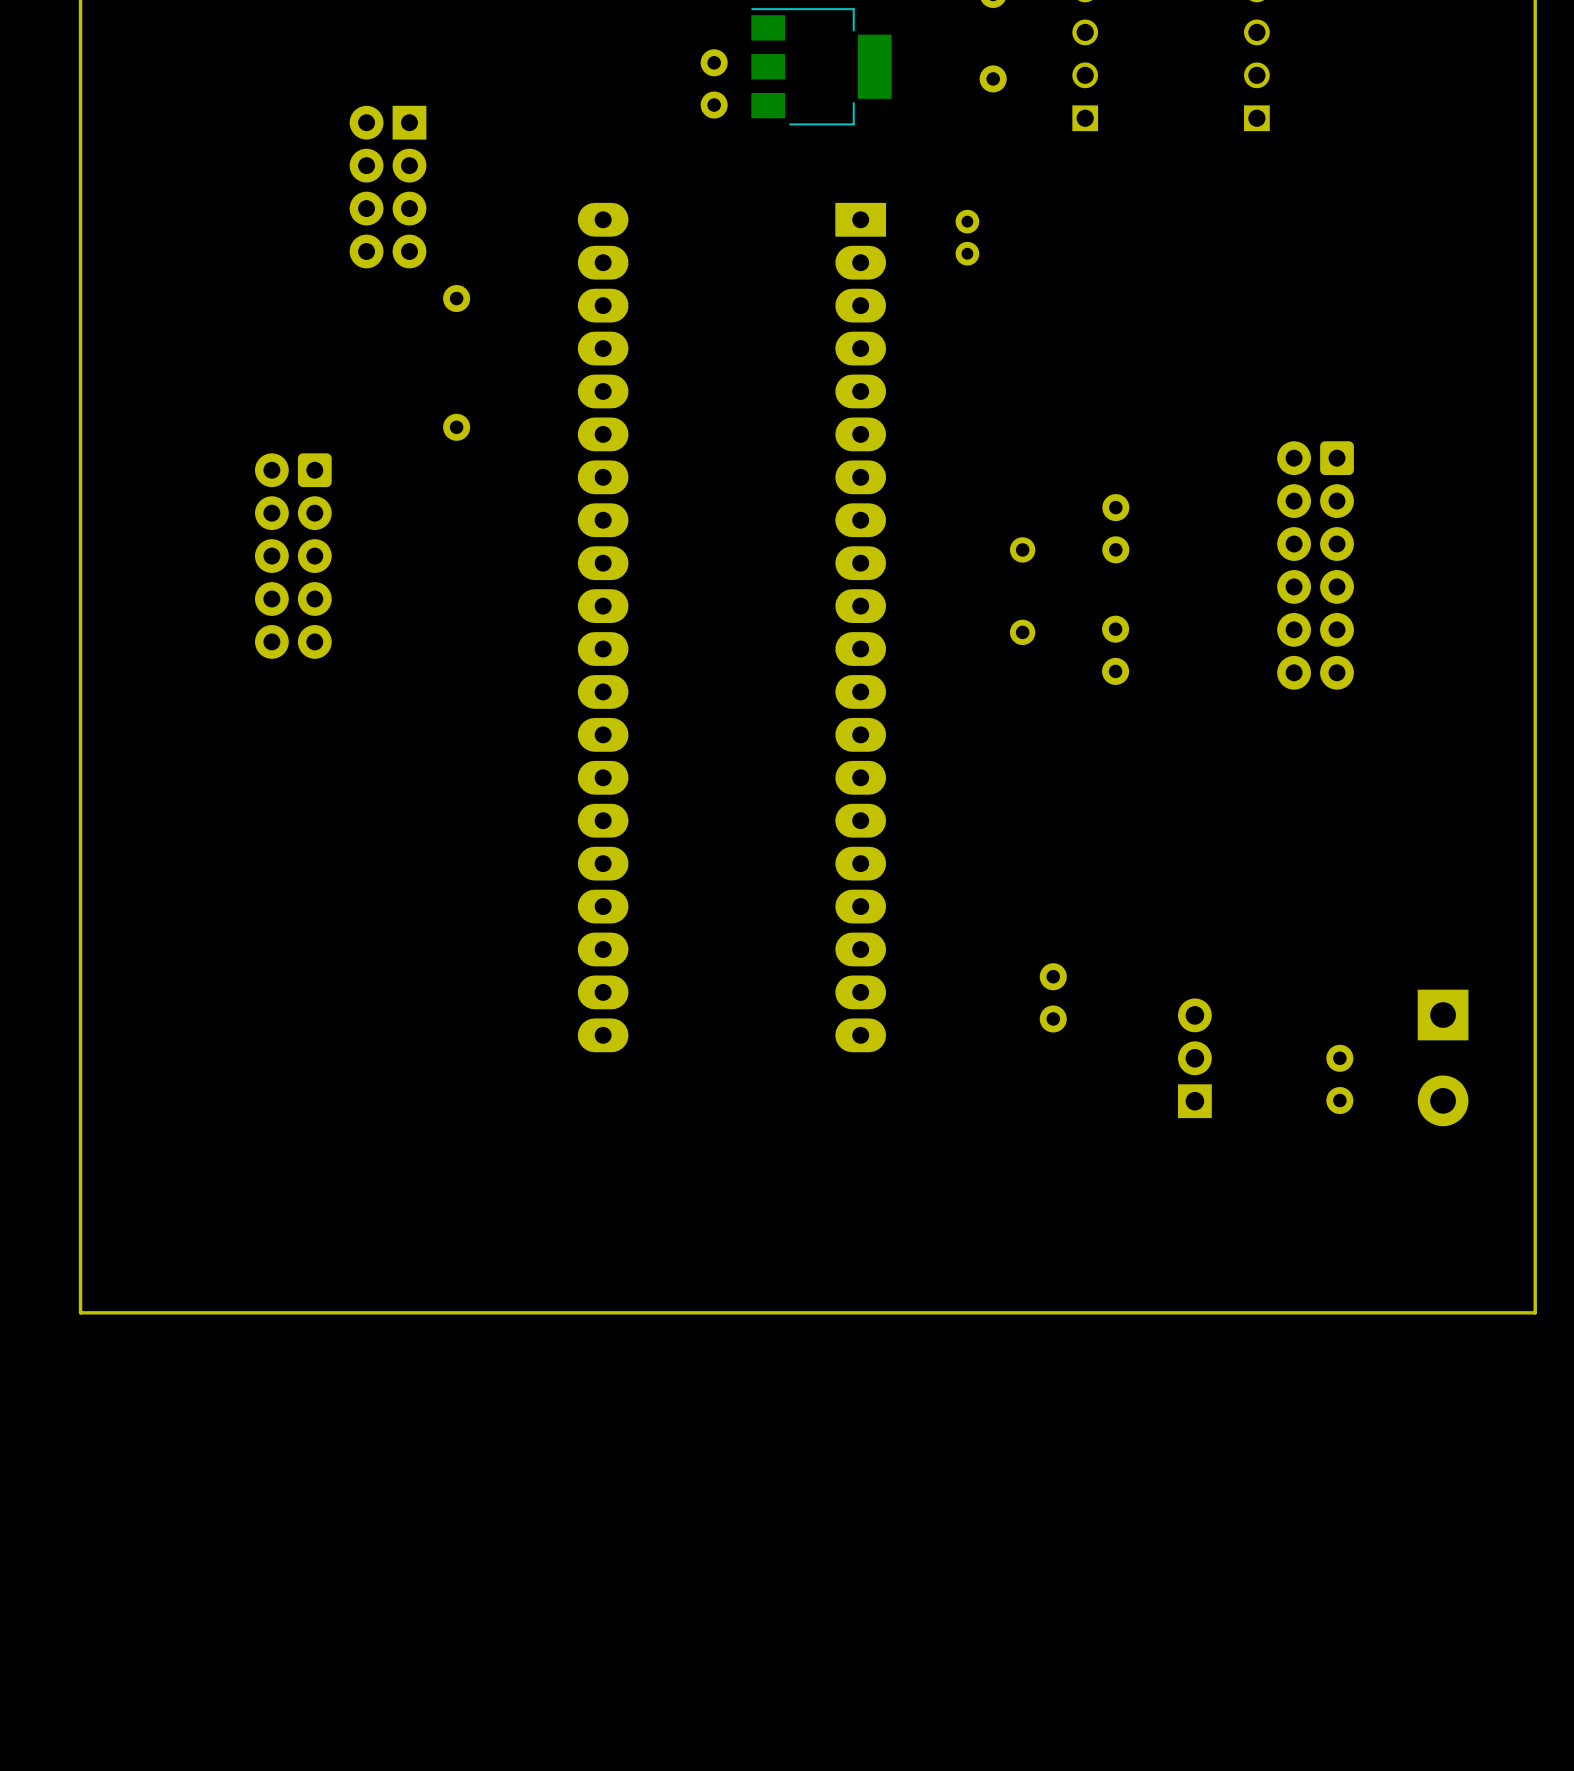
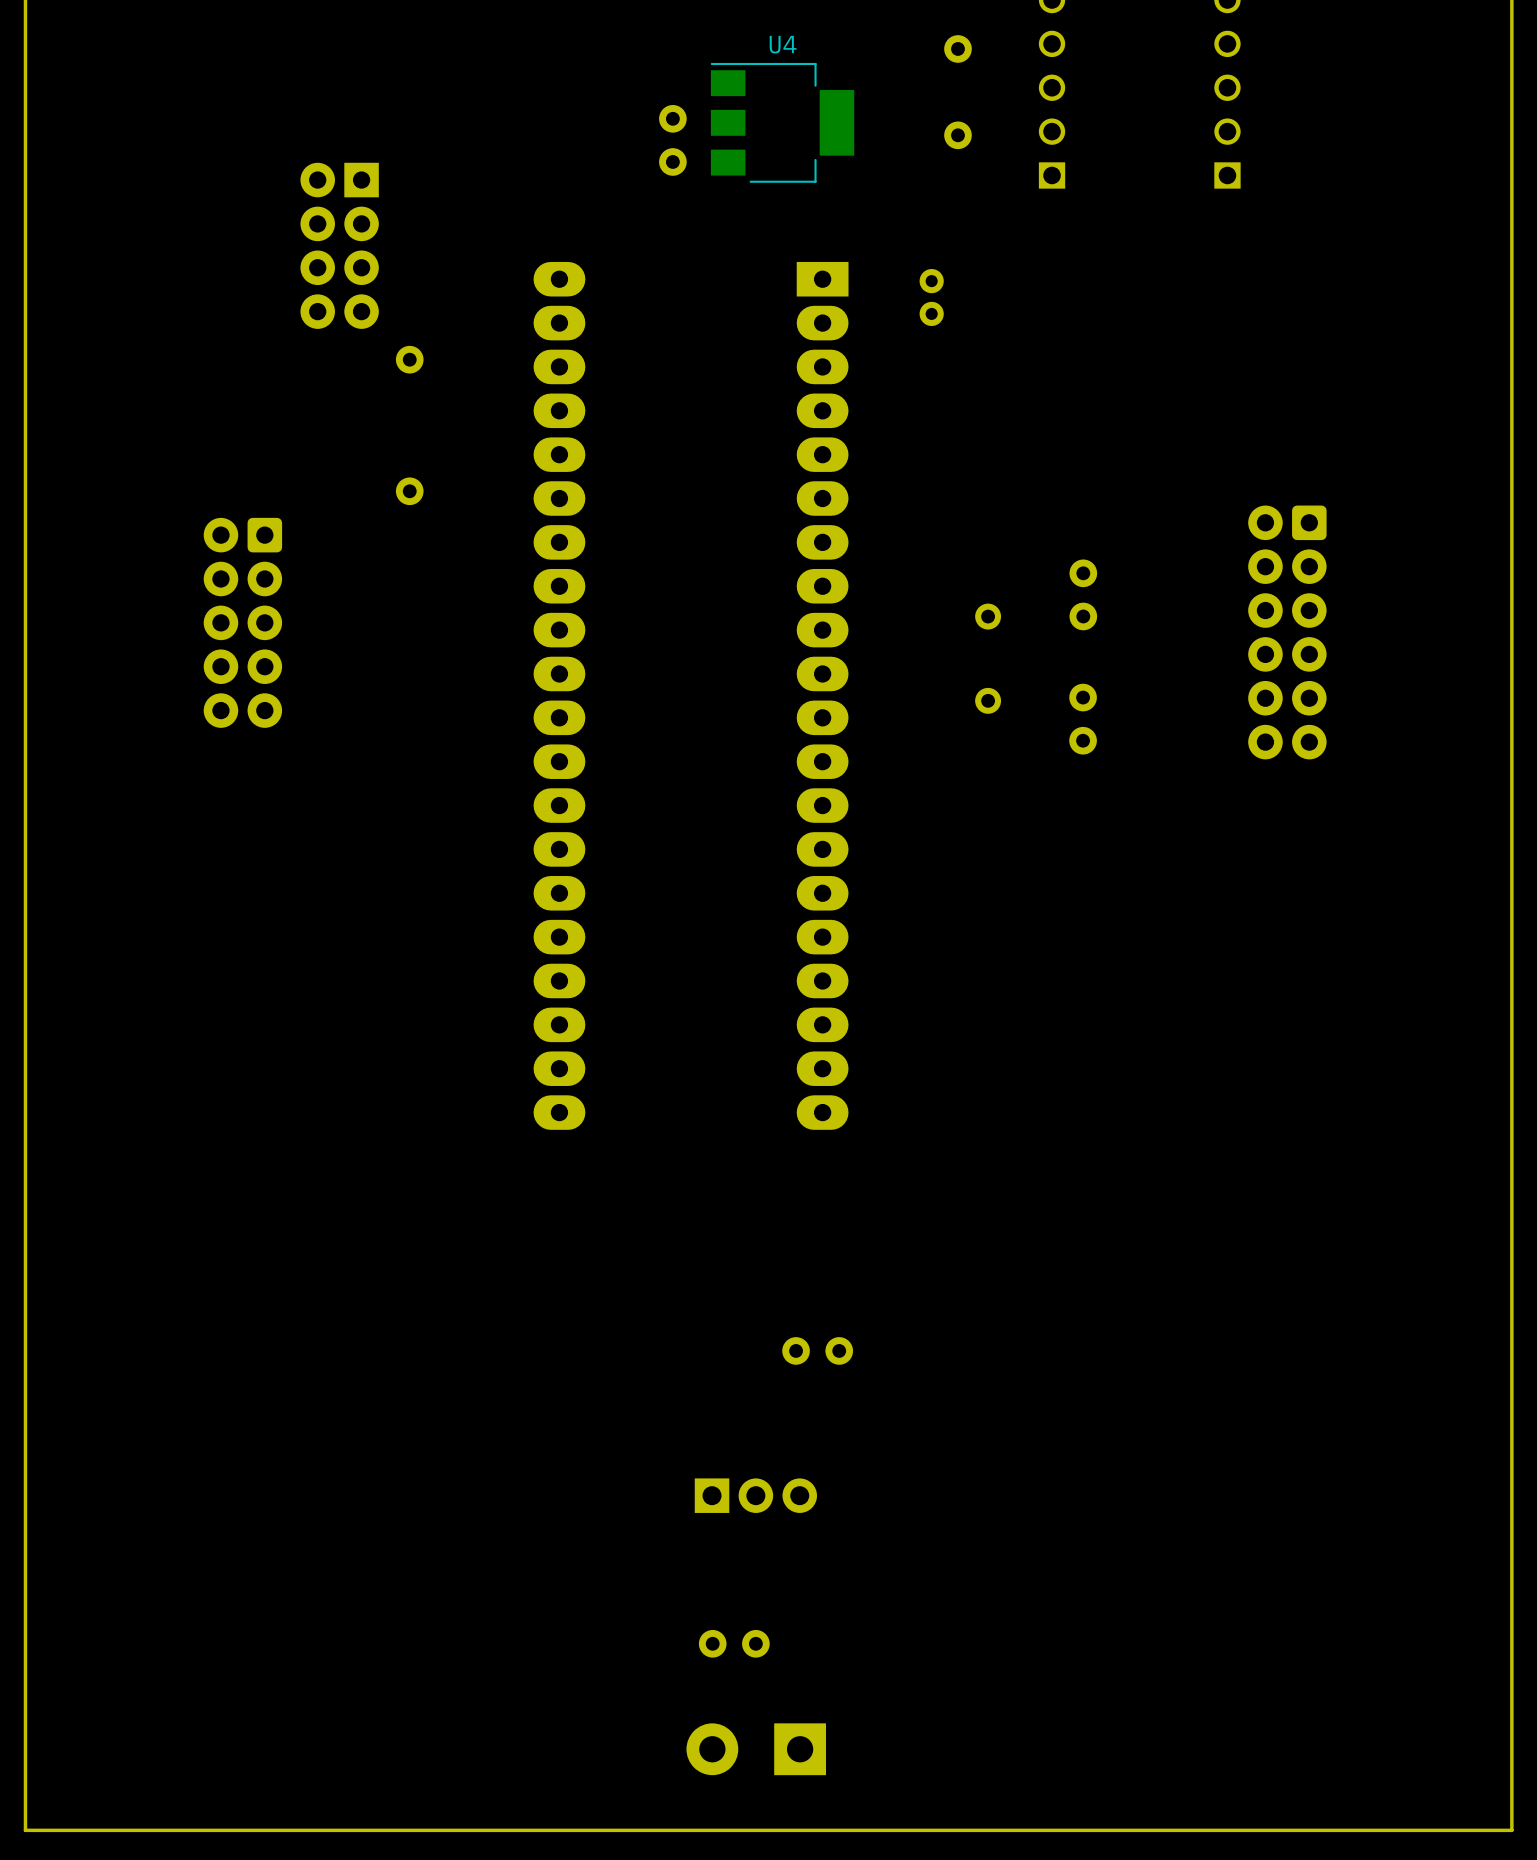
part: (1053, 997) -> none
part: (1443, 1057) -> none
part: (1194, 1058) -> none
part: (1339, 1079) -> none
part: none -> (817, 1350)
board edge: (1535, 1312) (80, 1312) -> (1511, 1396) (1511, 1830) (25, 1830) (25, 1396)
part: none -> (755, 1495)
part: none -> (734, 1643)
part: none -> (756, 1749)

